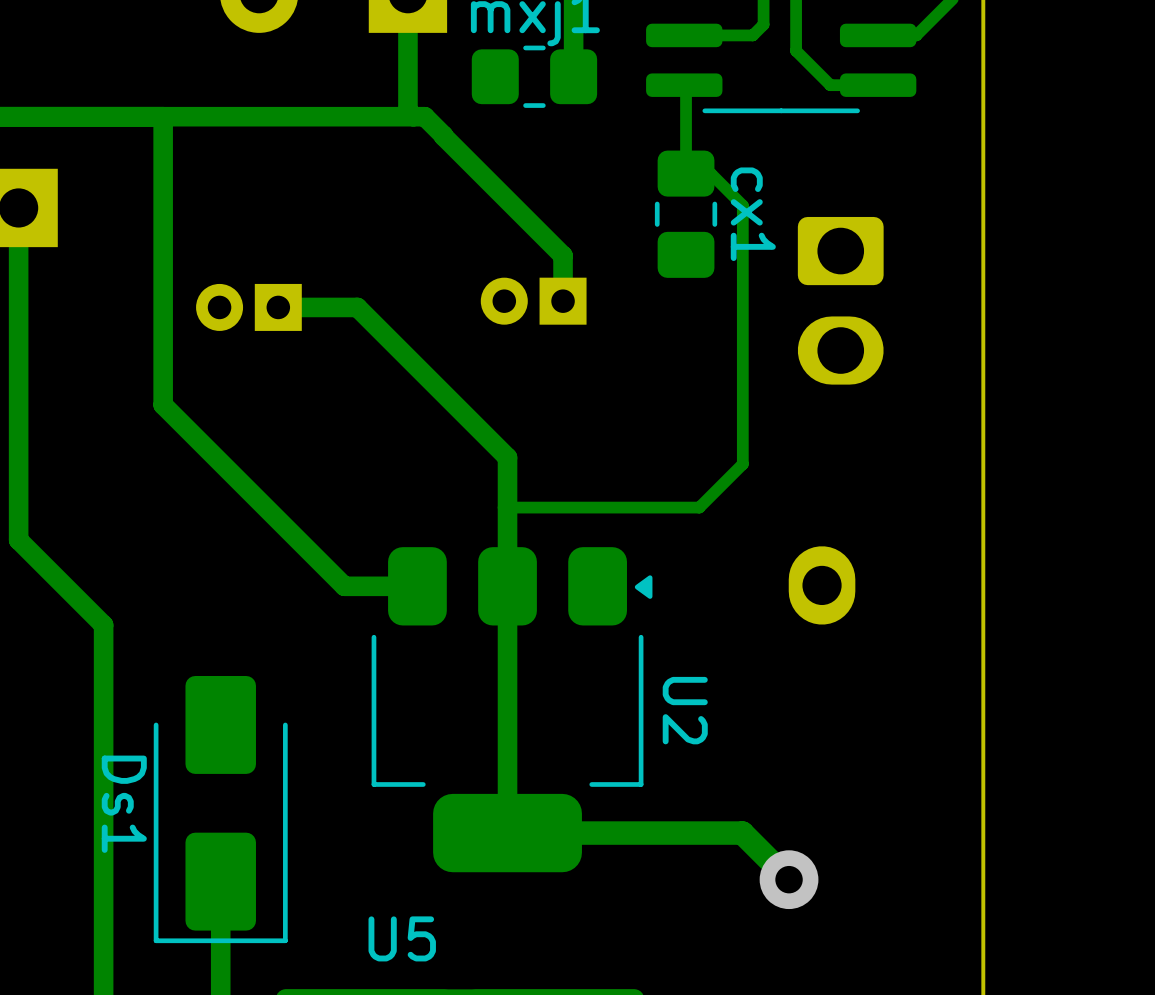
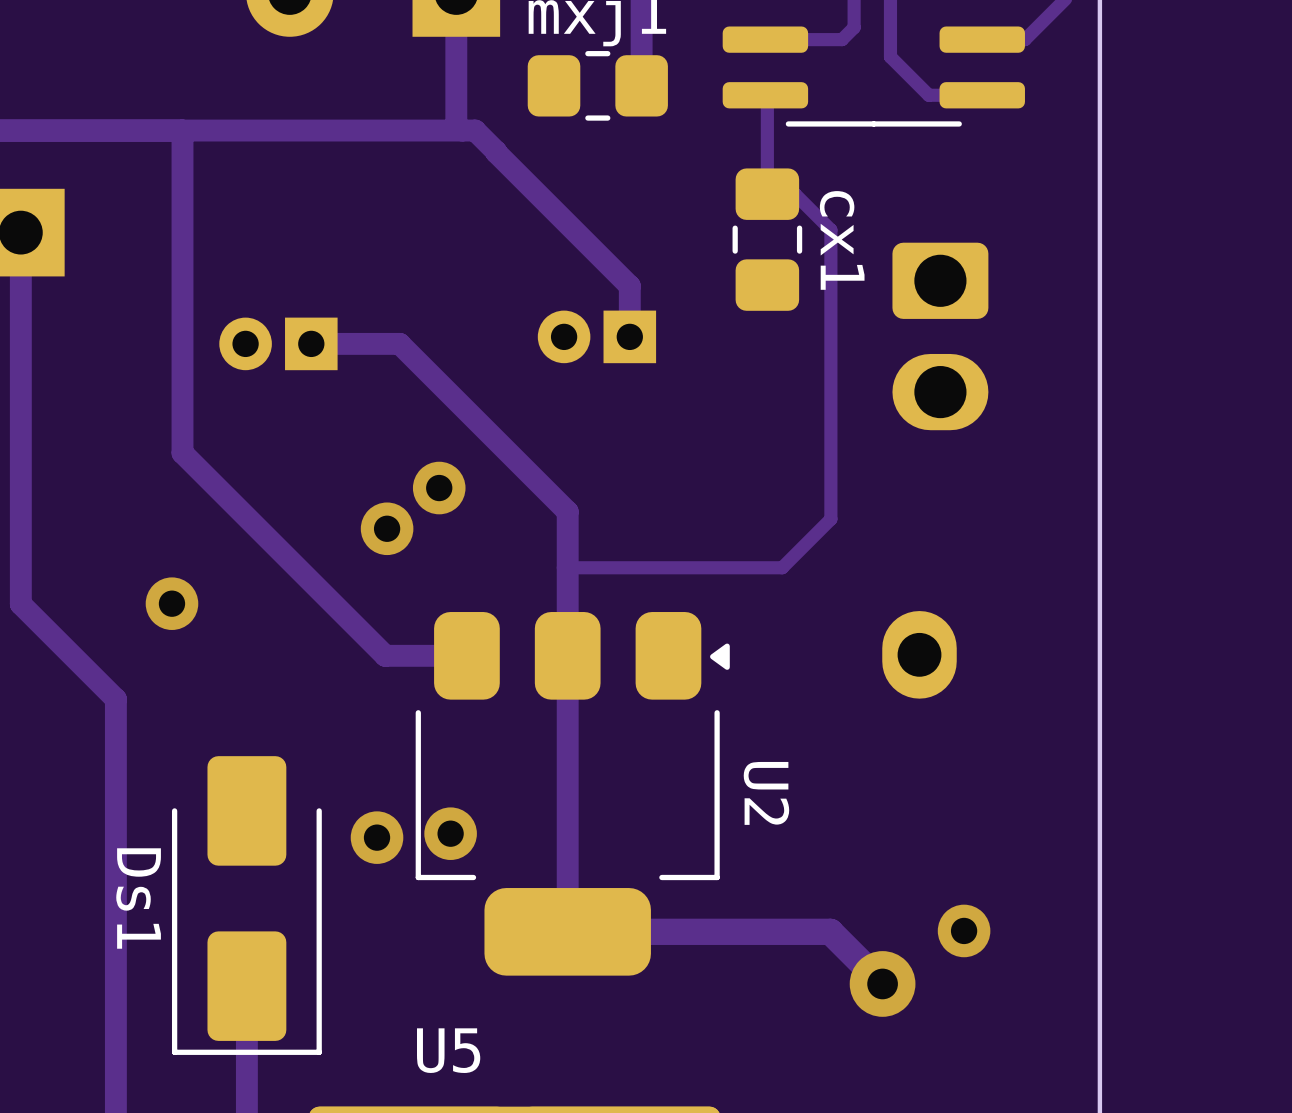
via: none -> (439, 488)
via: none -> (387, 528)
via: none -> (171, 603)
via: none -> (450, 833)
via: none -> (377, 837)
via: none -> (964, 930)

